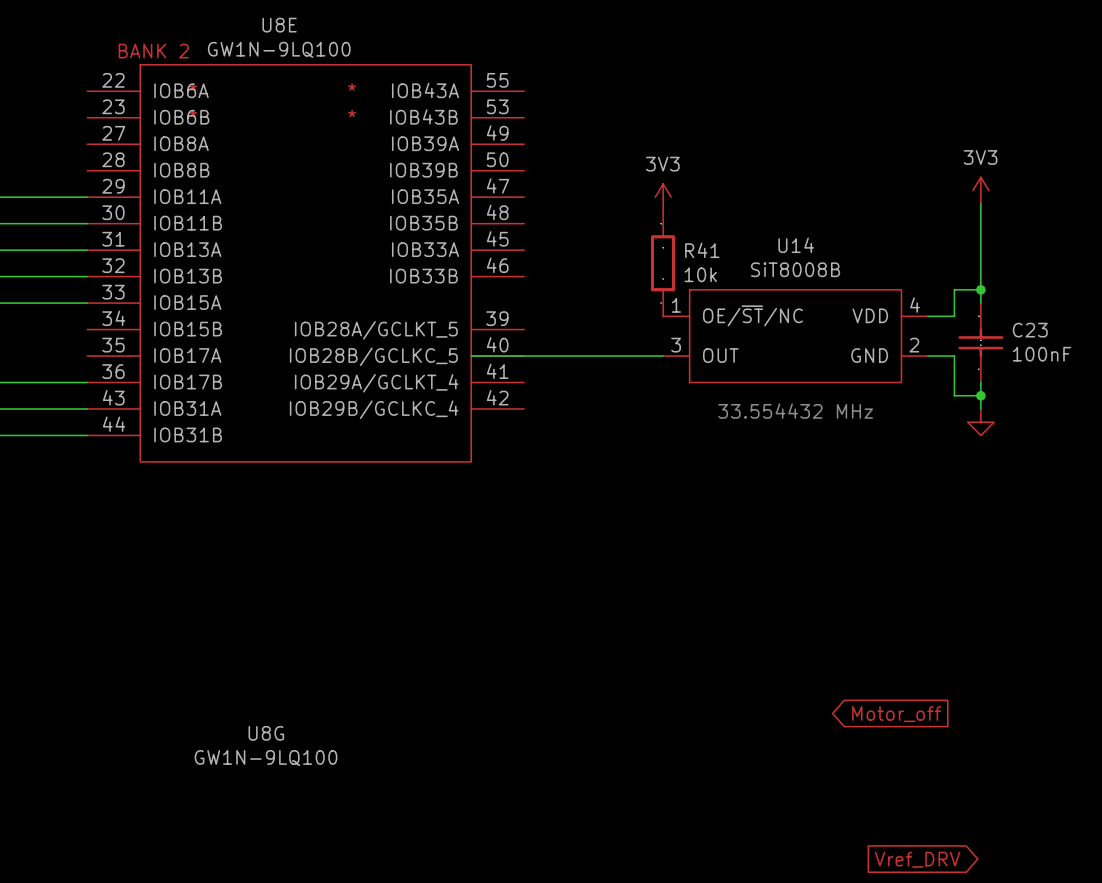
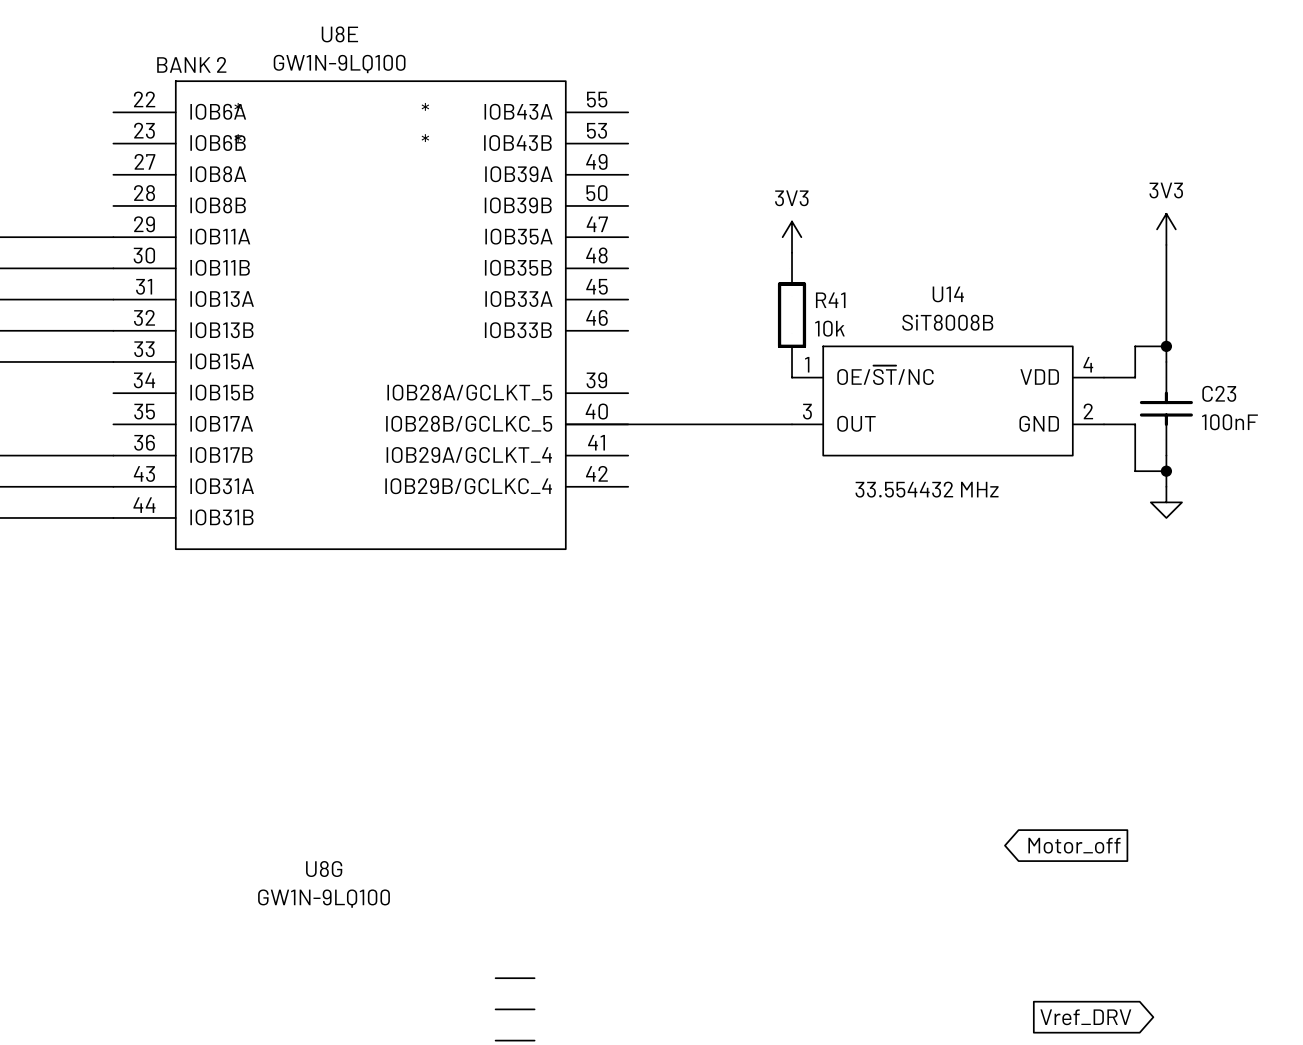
wire: none -> (495, 978) (534, 978)
wire: none -> (495, 1009) (534, 1009)
wire: none -> (495, 1040) (534, 1040)

